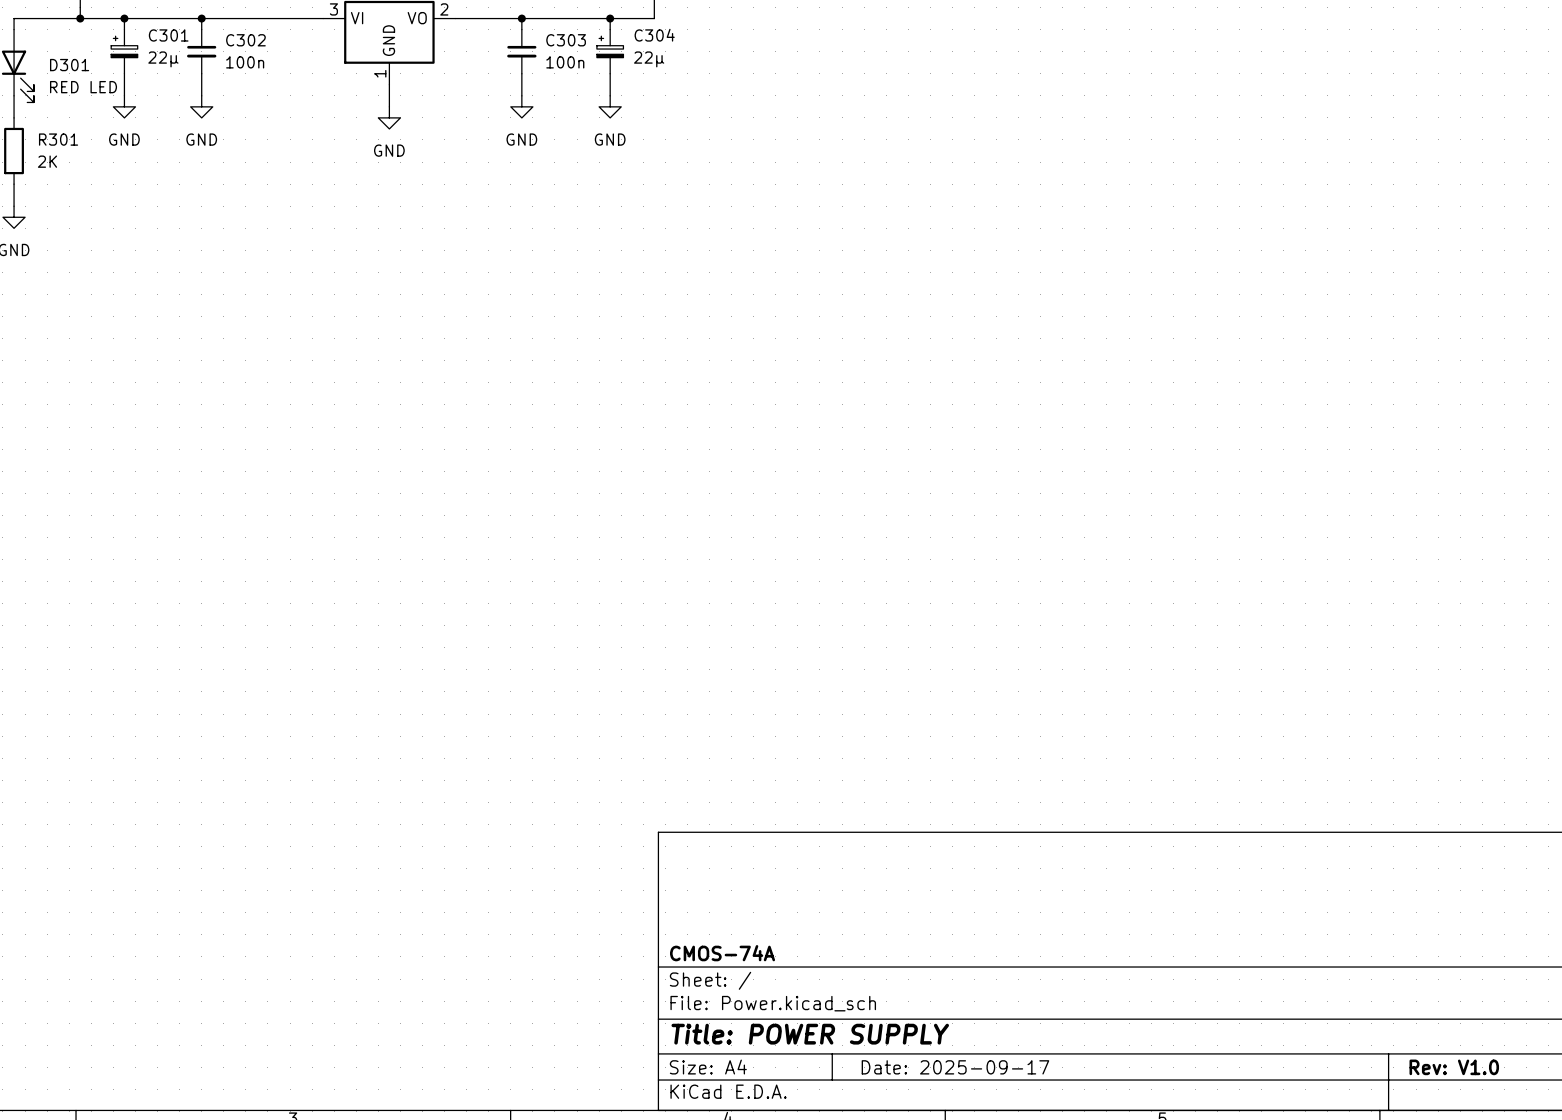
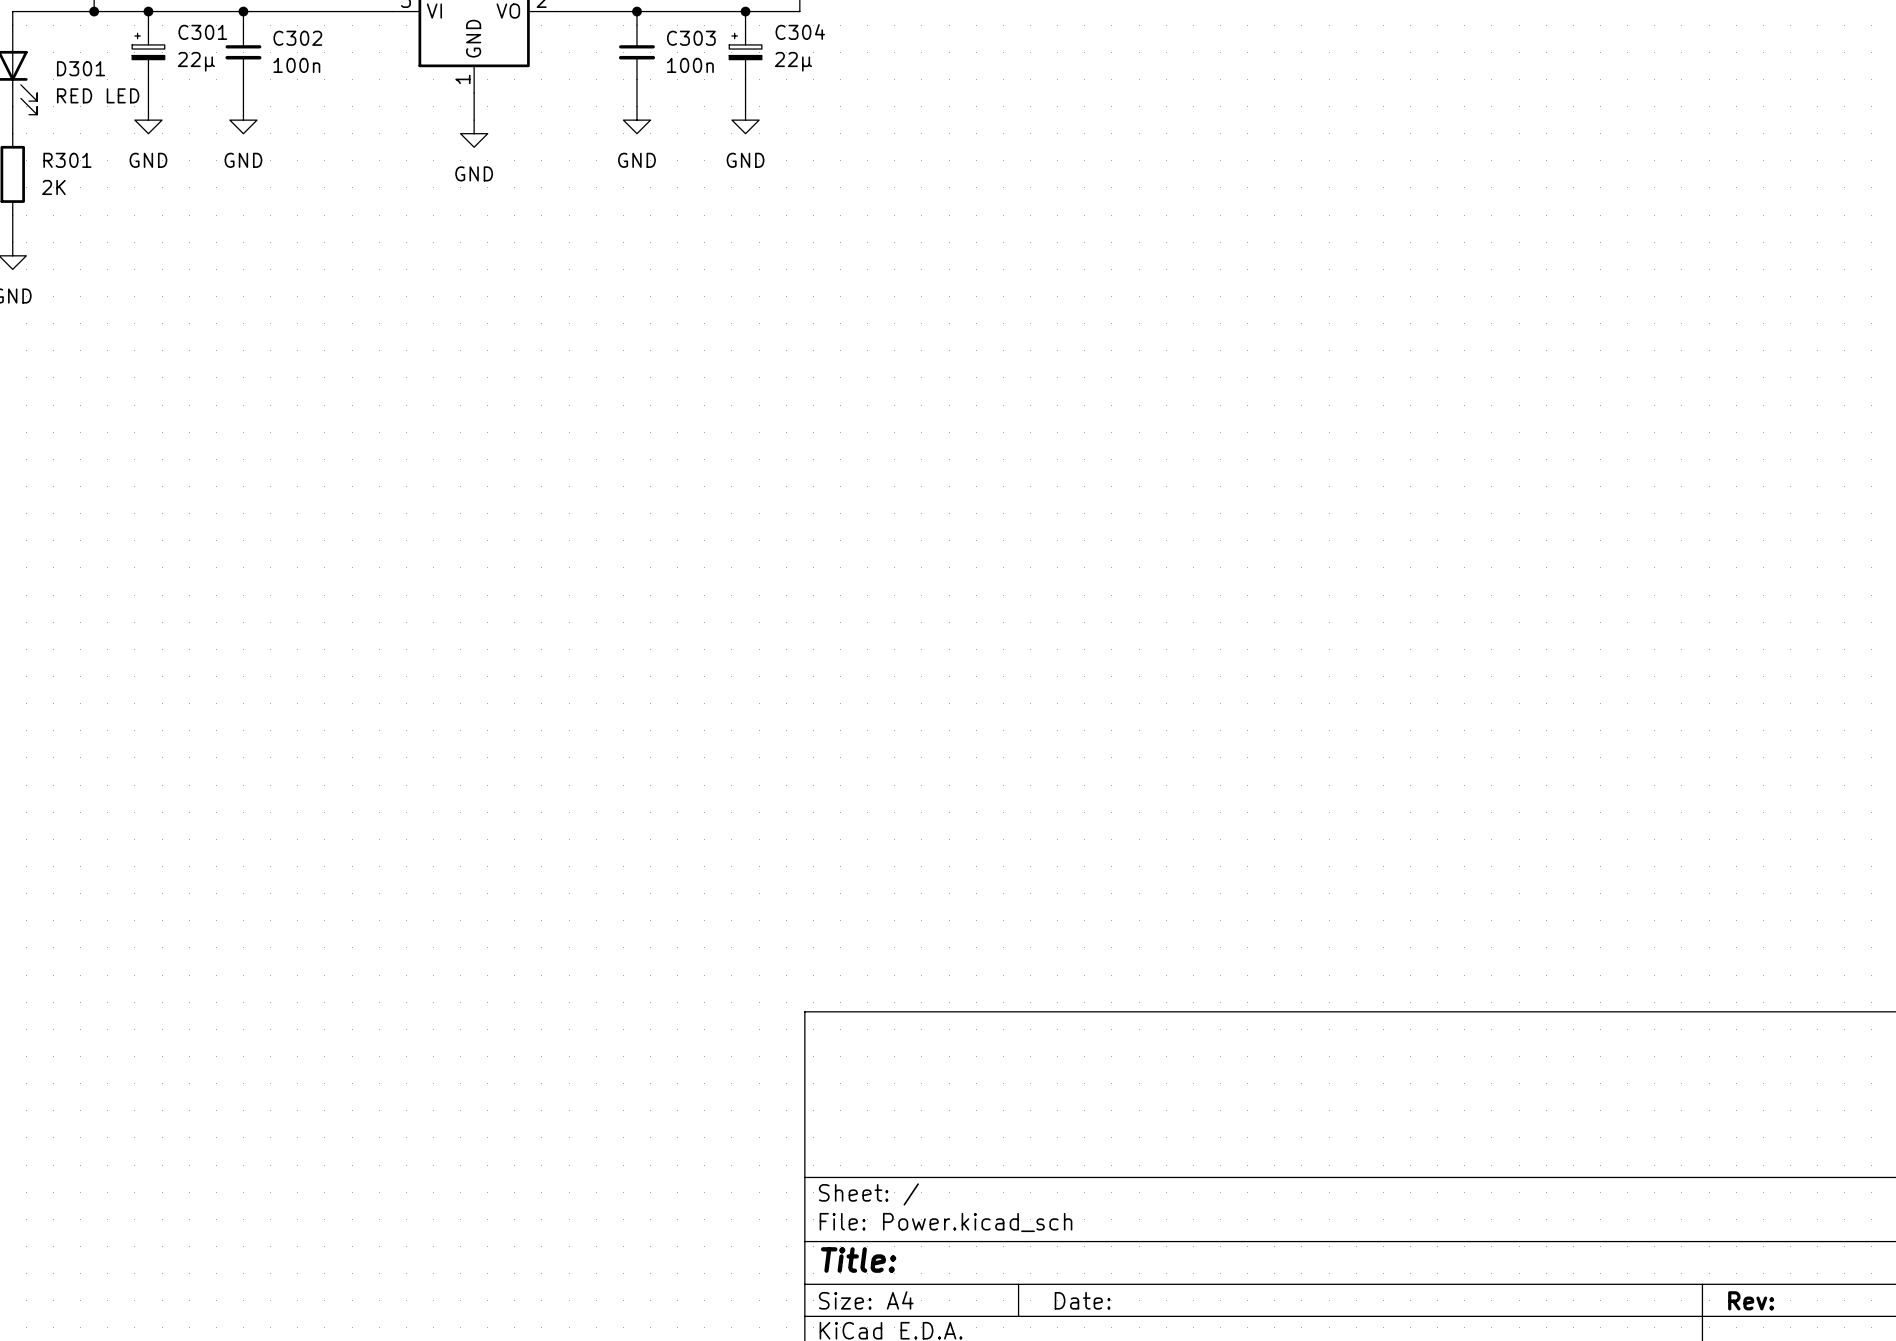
title block: CMOS-74A (722, 953) -> none
title block: Title: POWER SUPPLY (810, 1034) -> Title: (858, 1260)
title block: Date: 2025-09-17 (955, 1067) -> Date: (1082, 1300)
title block: Rev: V1.0 (1454, 1067) -> Rev: (1751, 1300)

